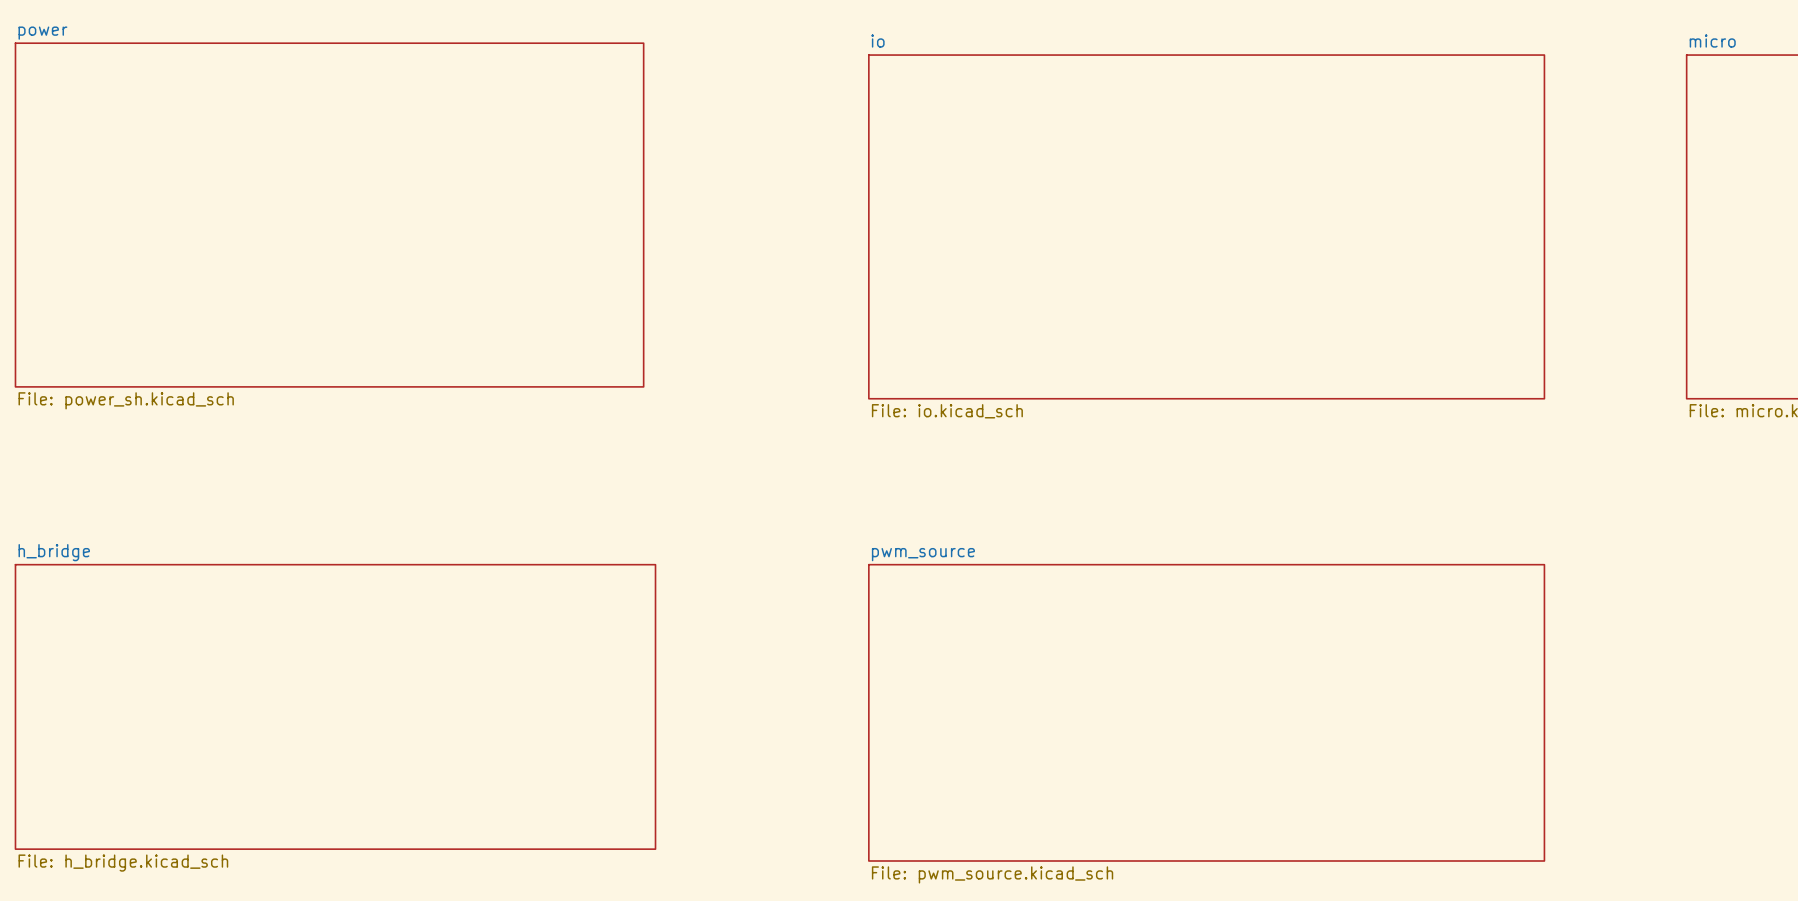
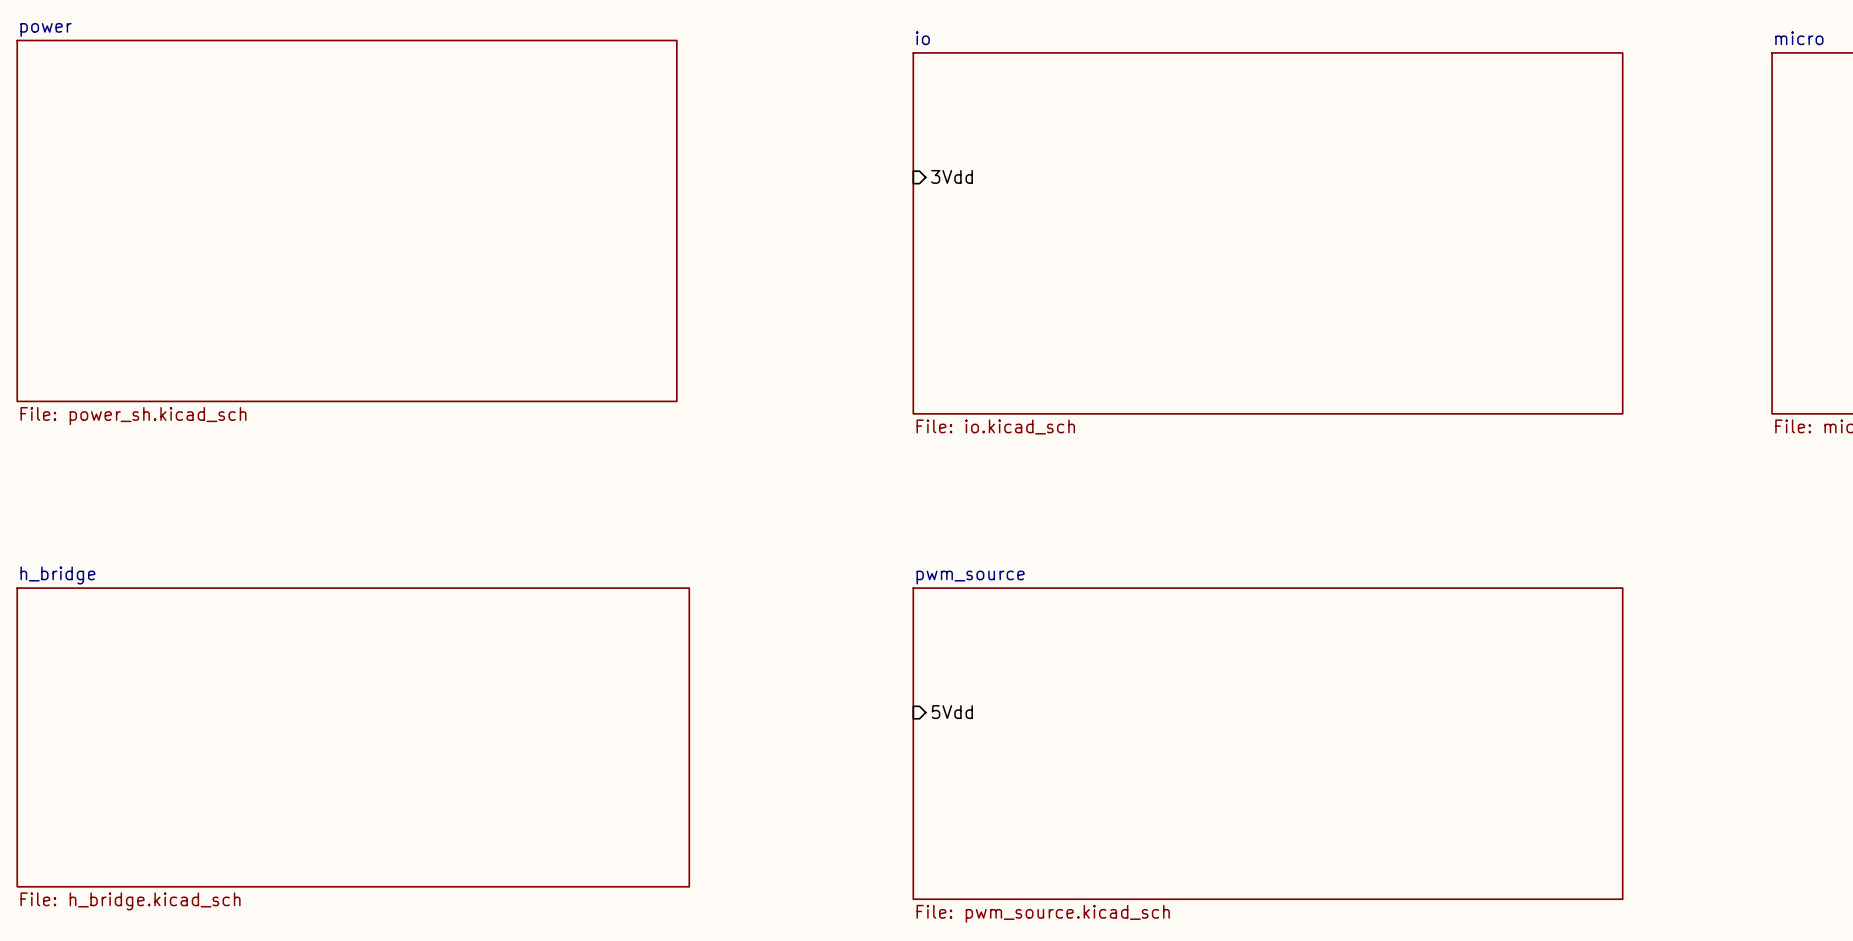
sheet pin: none -> 3Vdd (952, 176)
sheet pin: none -> 5Vdd (952, 712)

